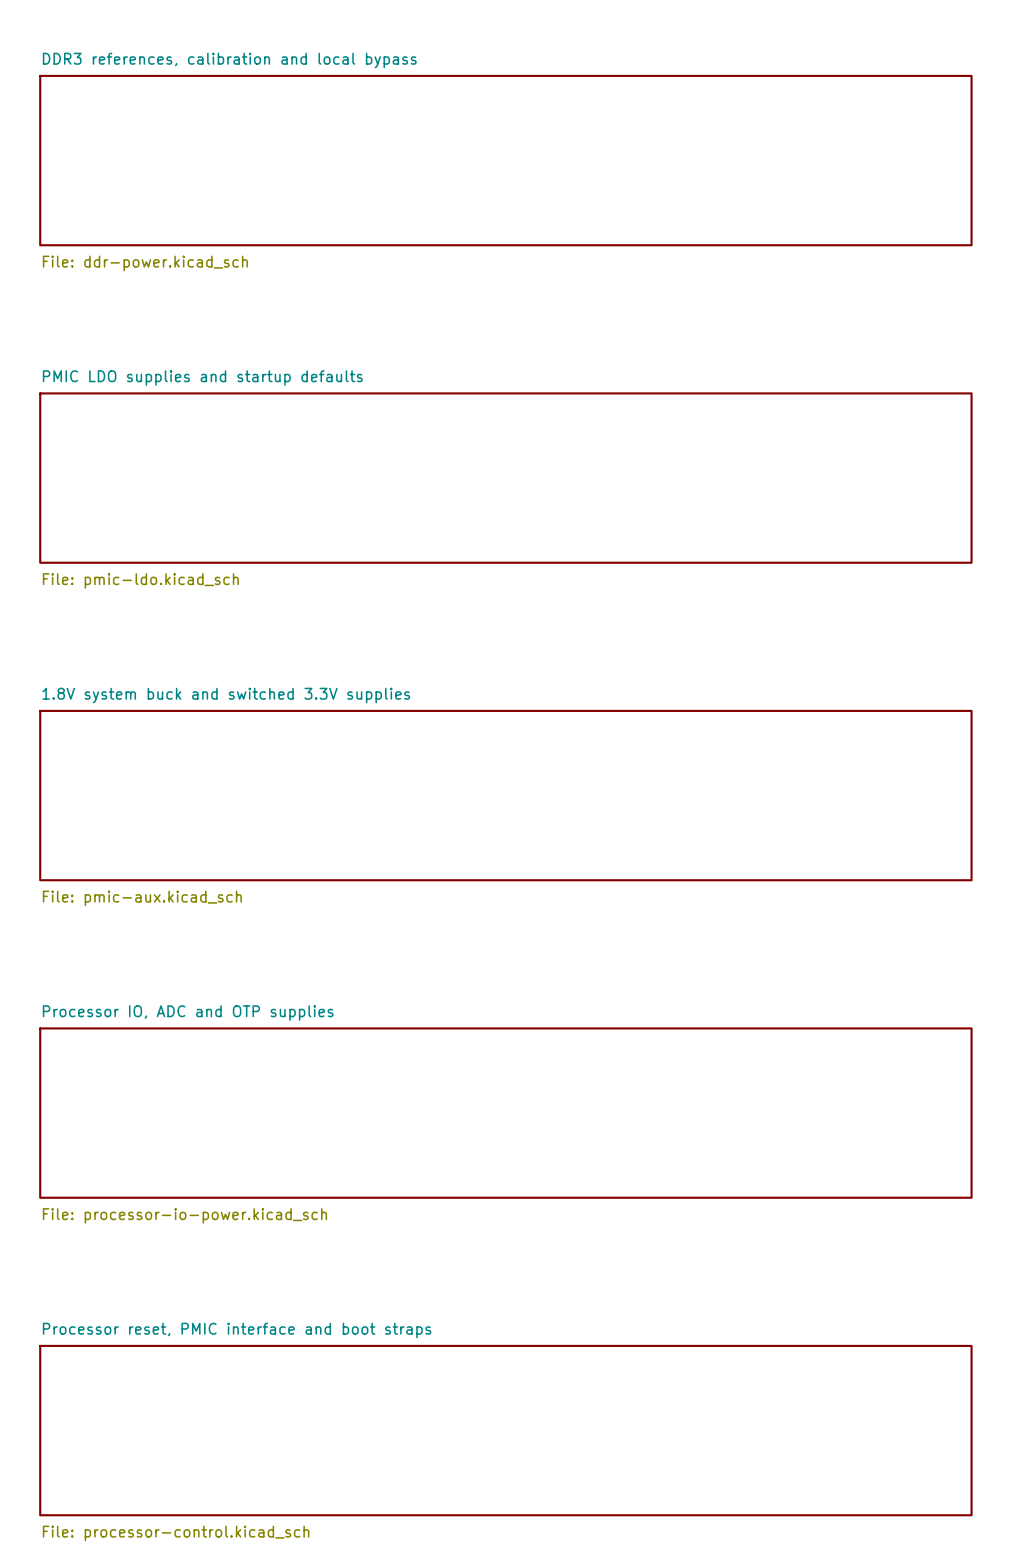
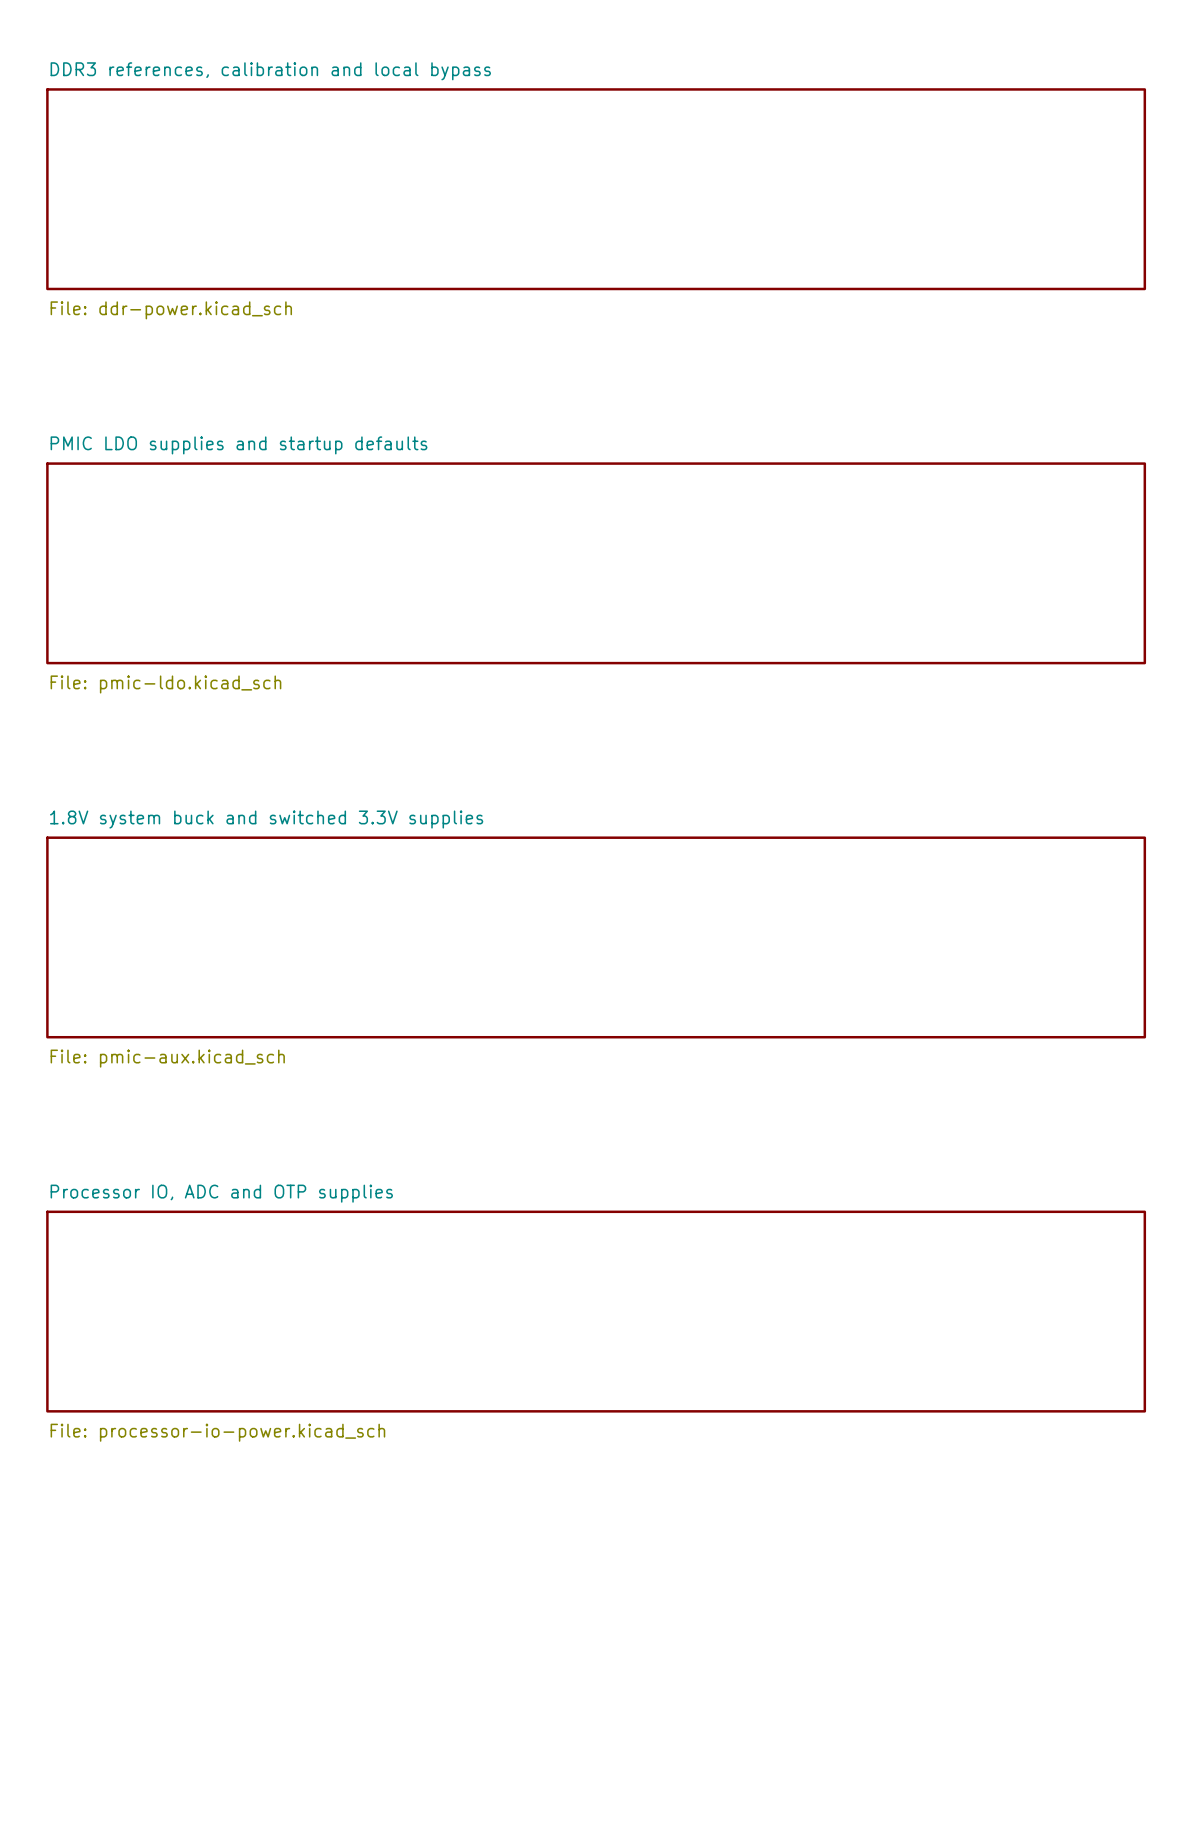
sheet Processor reset, PMIC interface and boot straps: File: processor-control.kicad_sch (505, 1430) -> none

